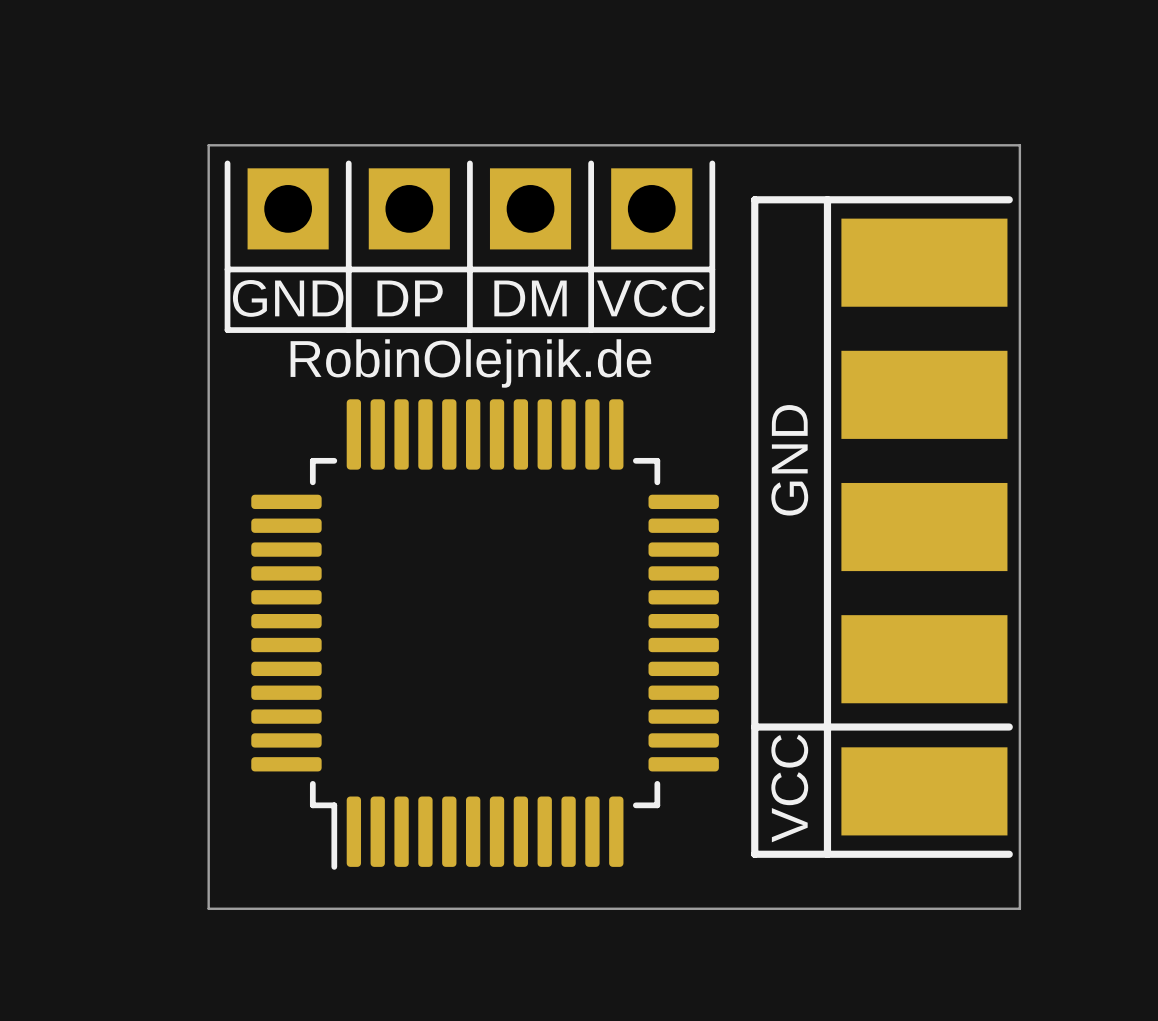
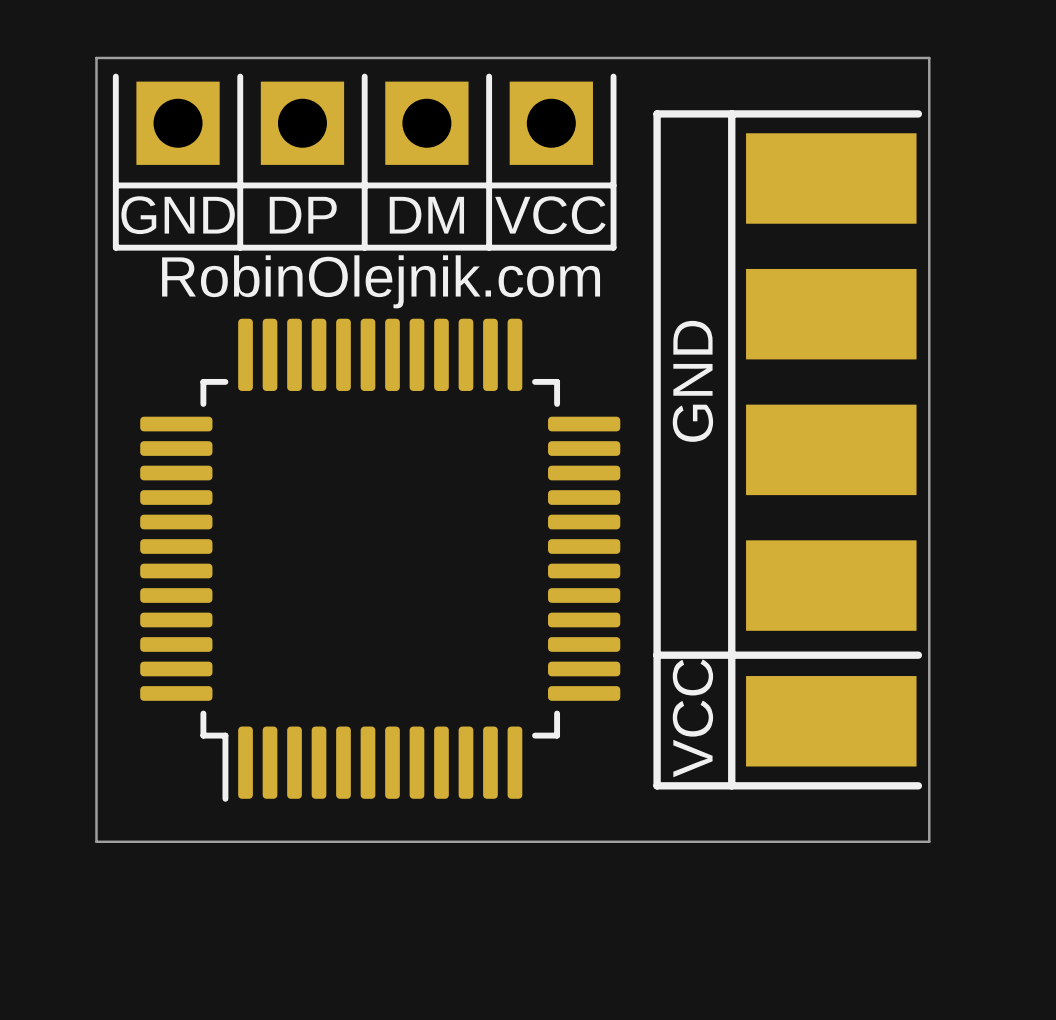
part footprint: [751, 196, 1013, 858] -> [653, 110, 923, 790]
text: RobinOlejnik.de (470, 363) -> RobinOlejnik.com (381, 281)

